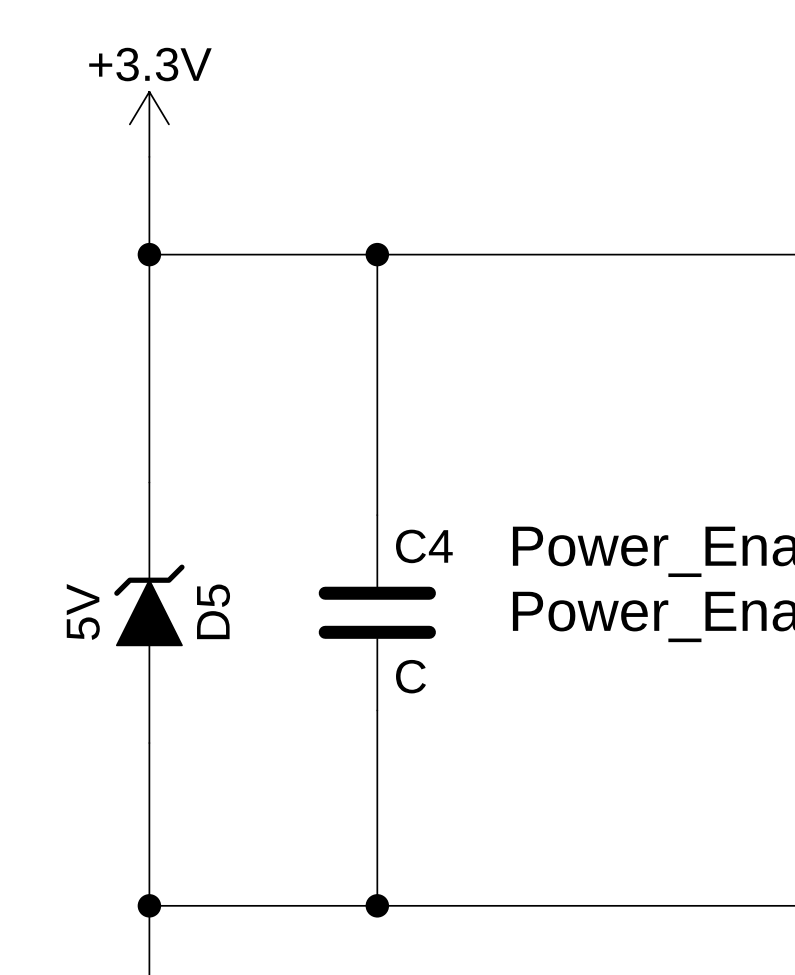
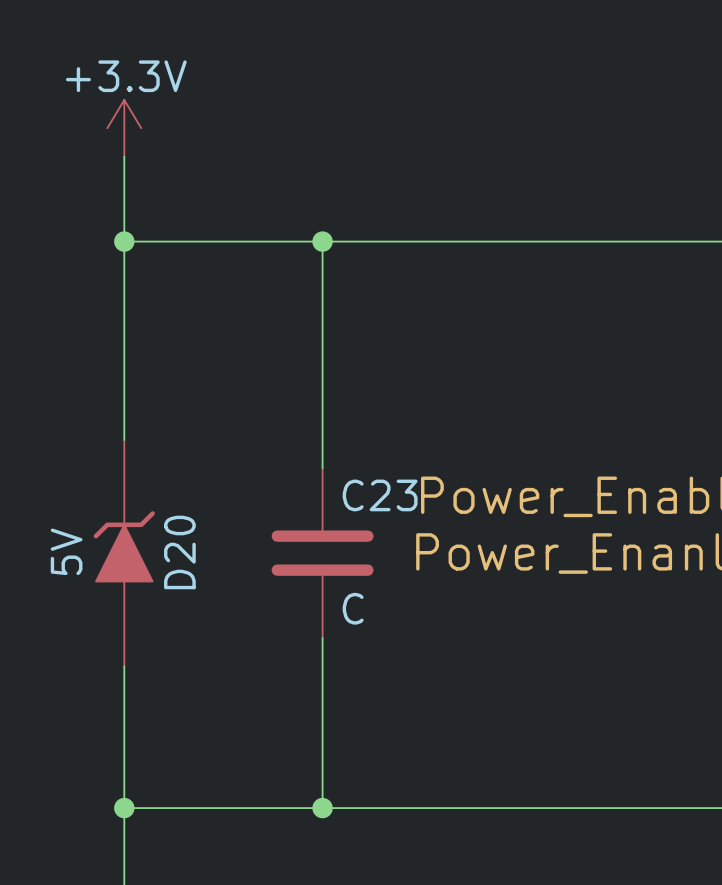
C4 name: C4 (424, 546) -> C23 (380, 495)
D5 name: D5 (213, 611) -> D20 (179, 552)

